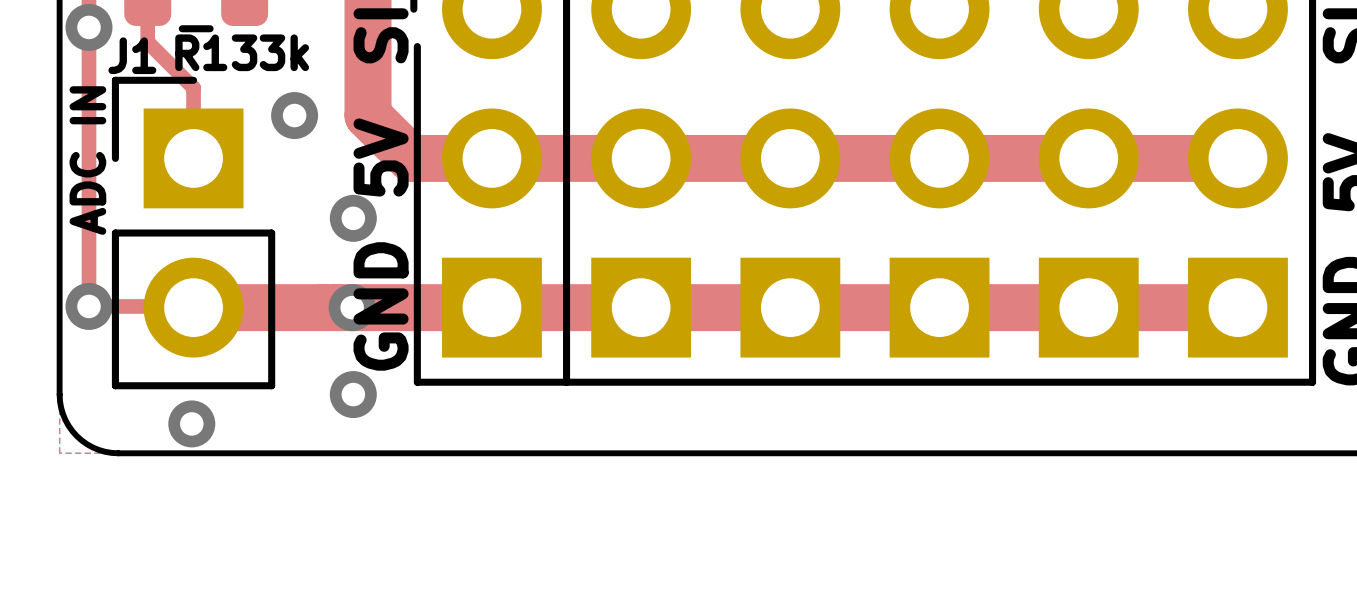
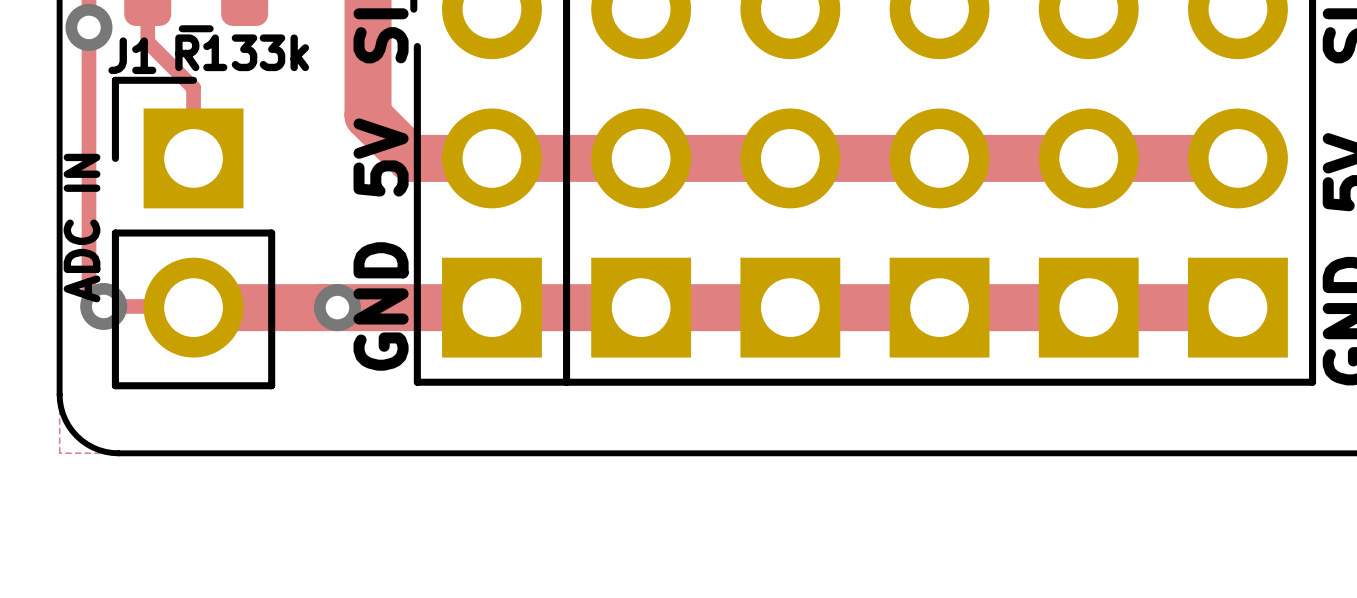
via: (294, 115) -> none
J1 value position: ADC IN (87, 160) -> ADC IN (82, 228)
via: (353, 218) -> none
via position: (88, 306) -> (103, 306)
via position: (352, 307) -> (337, 307)
via: (353, 394) -> none
via: (191, 423) -> none

